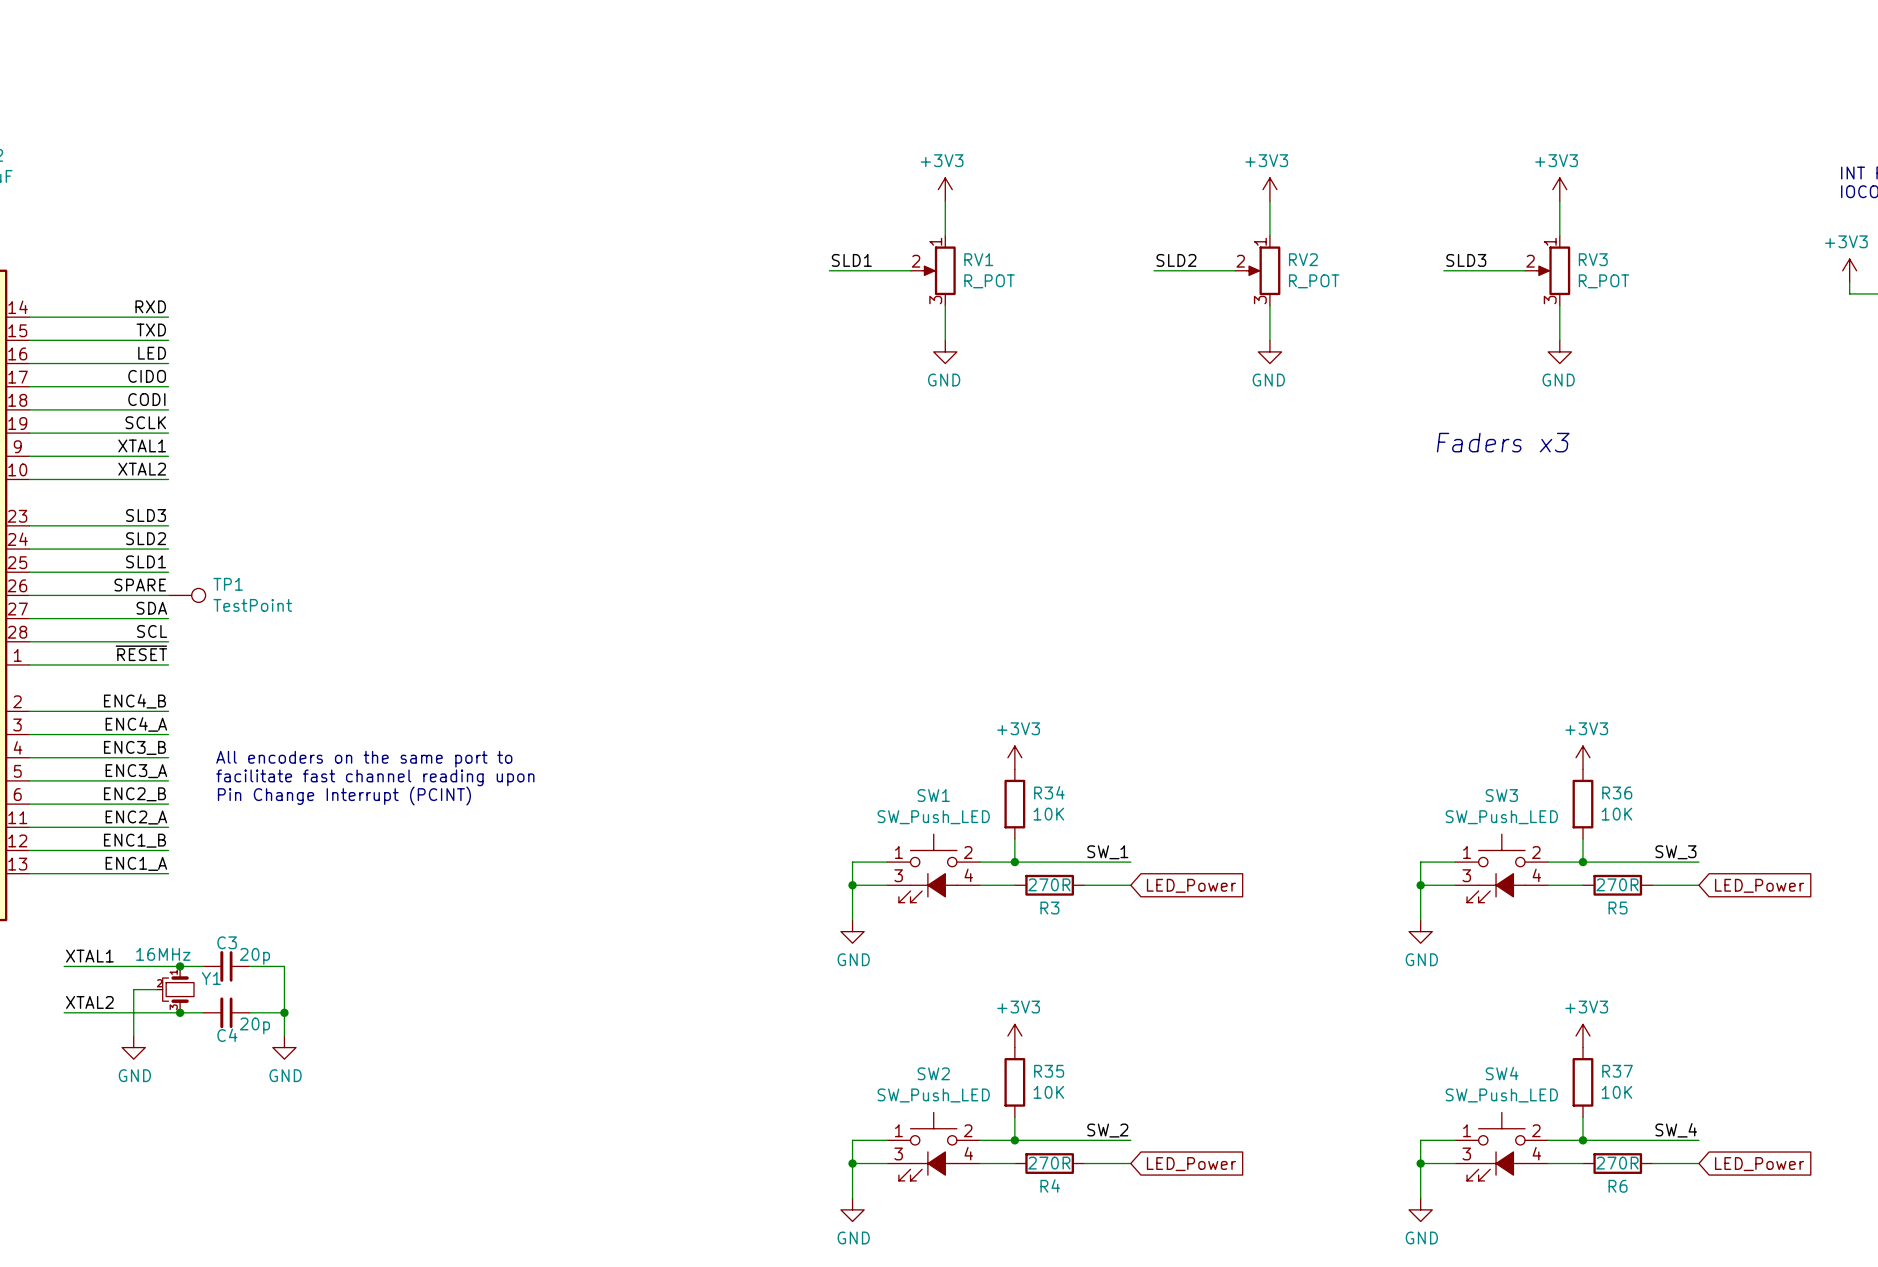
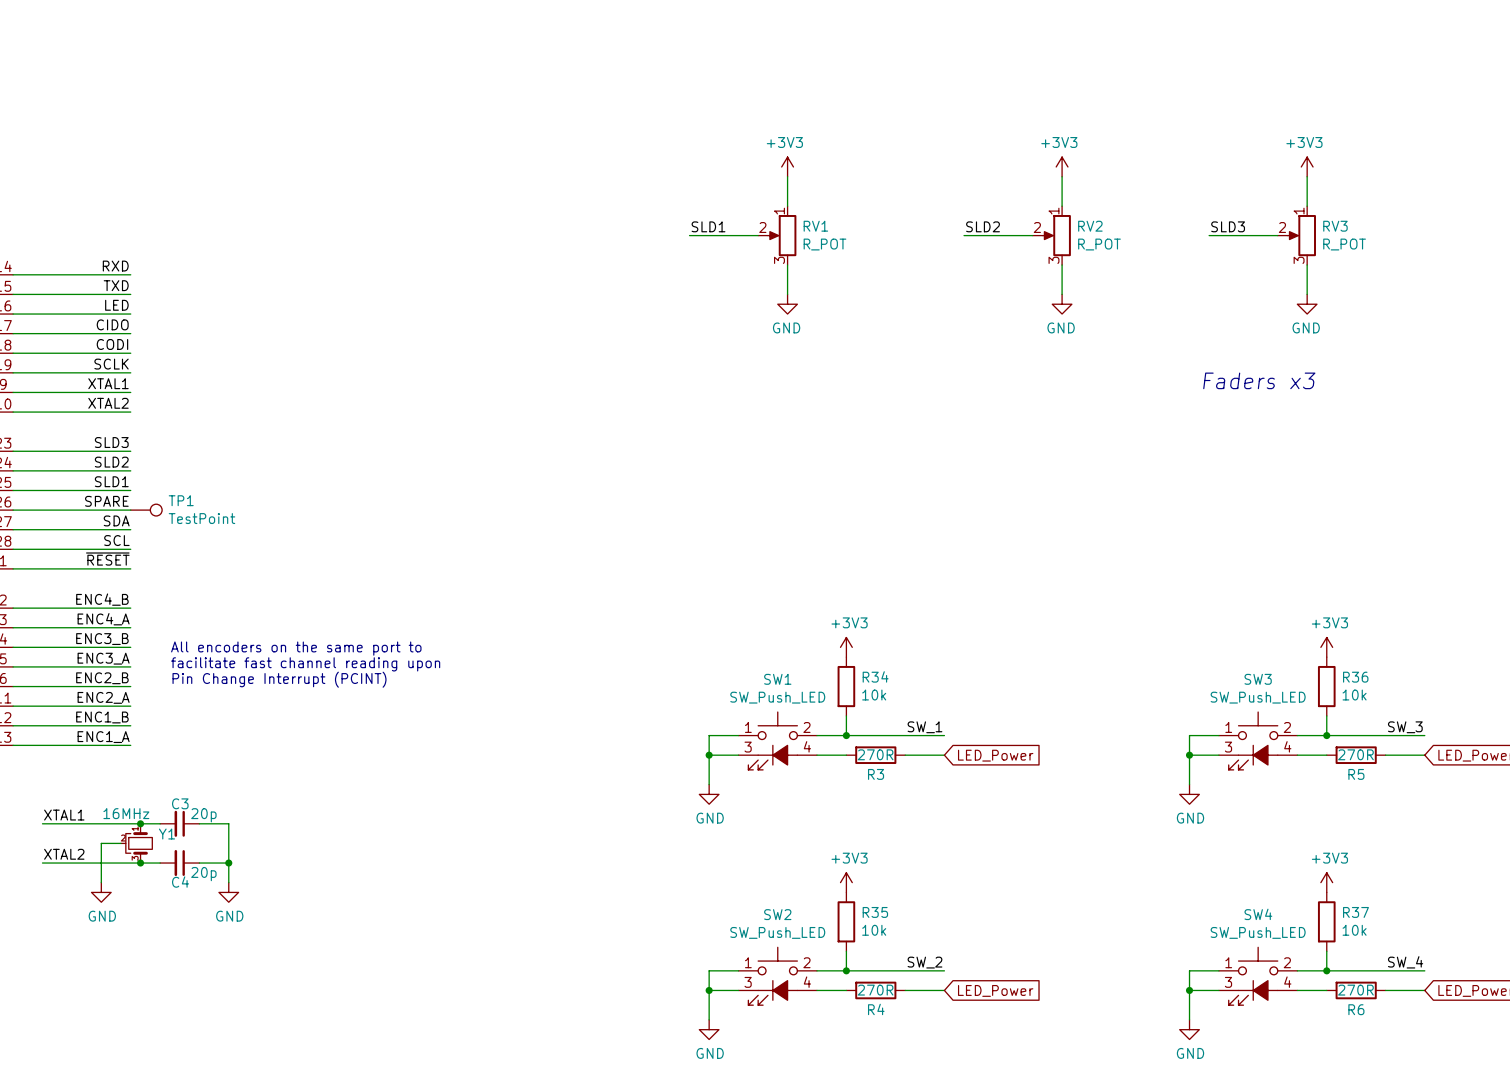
R34 value: 10K (1048, 814) -> 10k (874, 695)
R36 value: 10K (1616, 814) -> 10k (1354, 695)
R35 value: 10K (1048, 1092) -> 10k (874, 930)
R37 value: 10K (1616, 1092) -> 10k (1354, 930)

